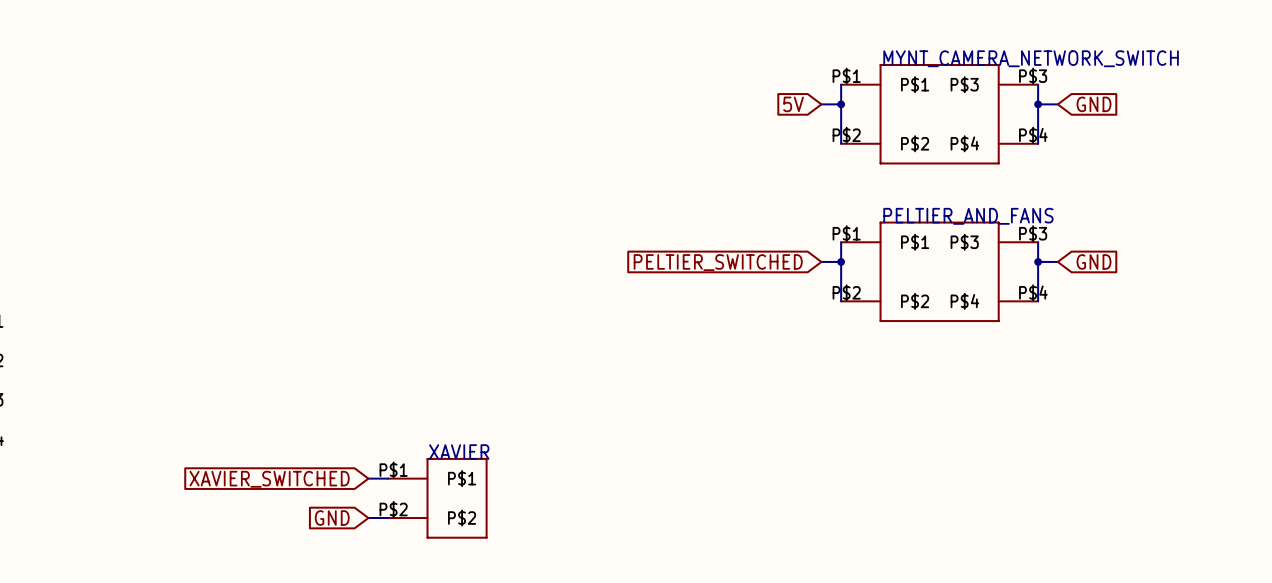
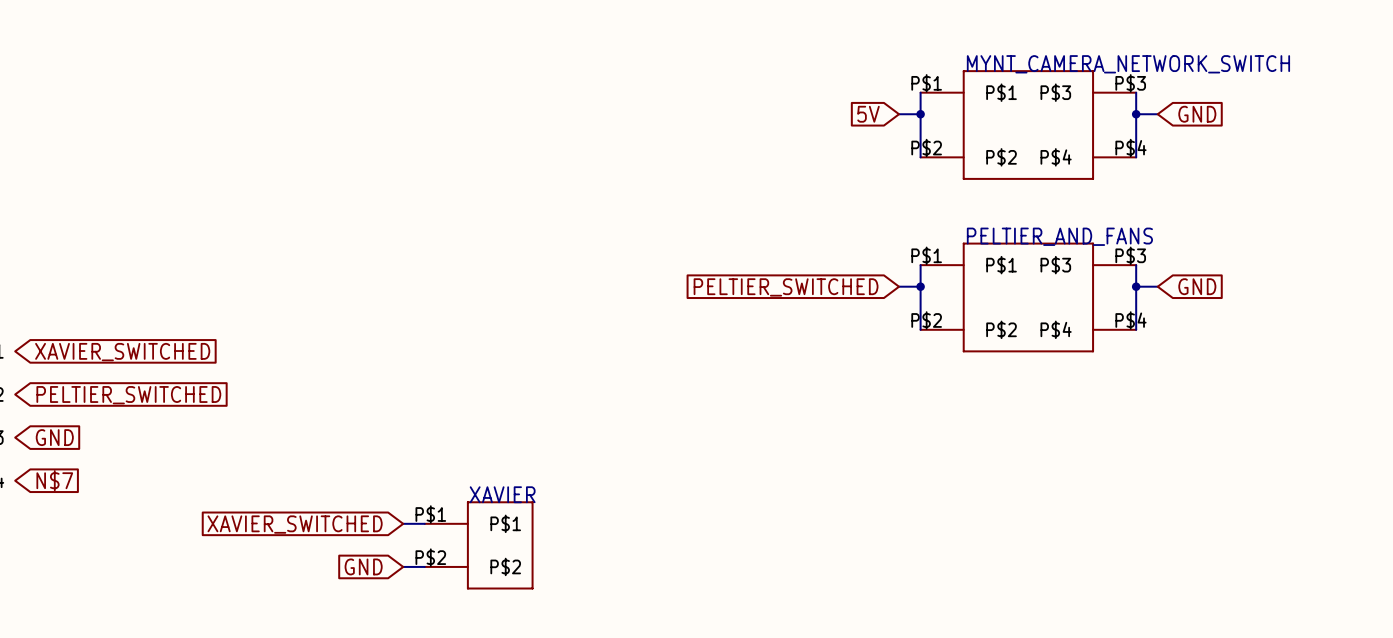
global label: none -> XAVIER_SWITCHED (122, 352)
global label: none -> PELTIER_SWITCHED (128, 395)
global label: none -> GND (54, 437)
global label: none -> N$7 (54, 480)

